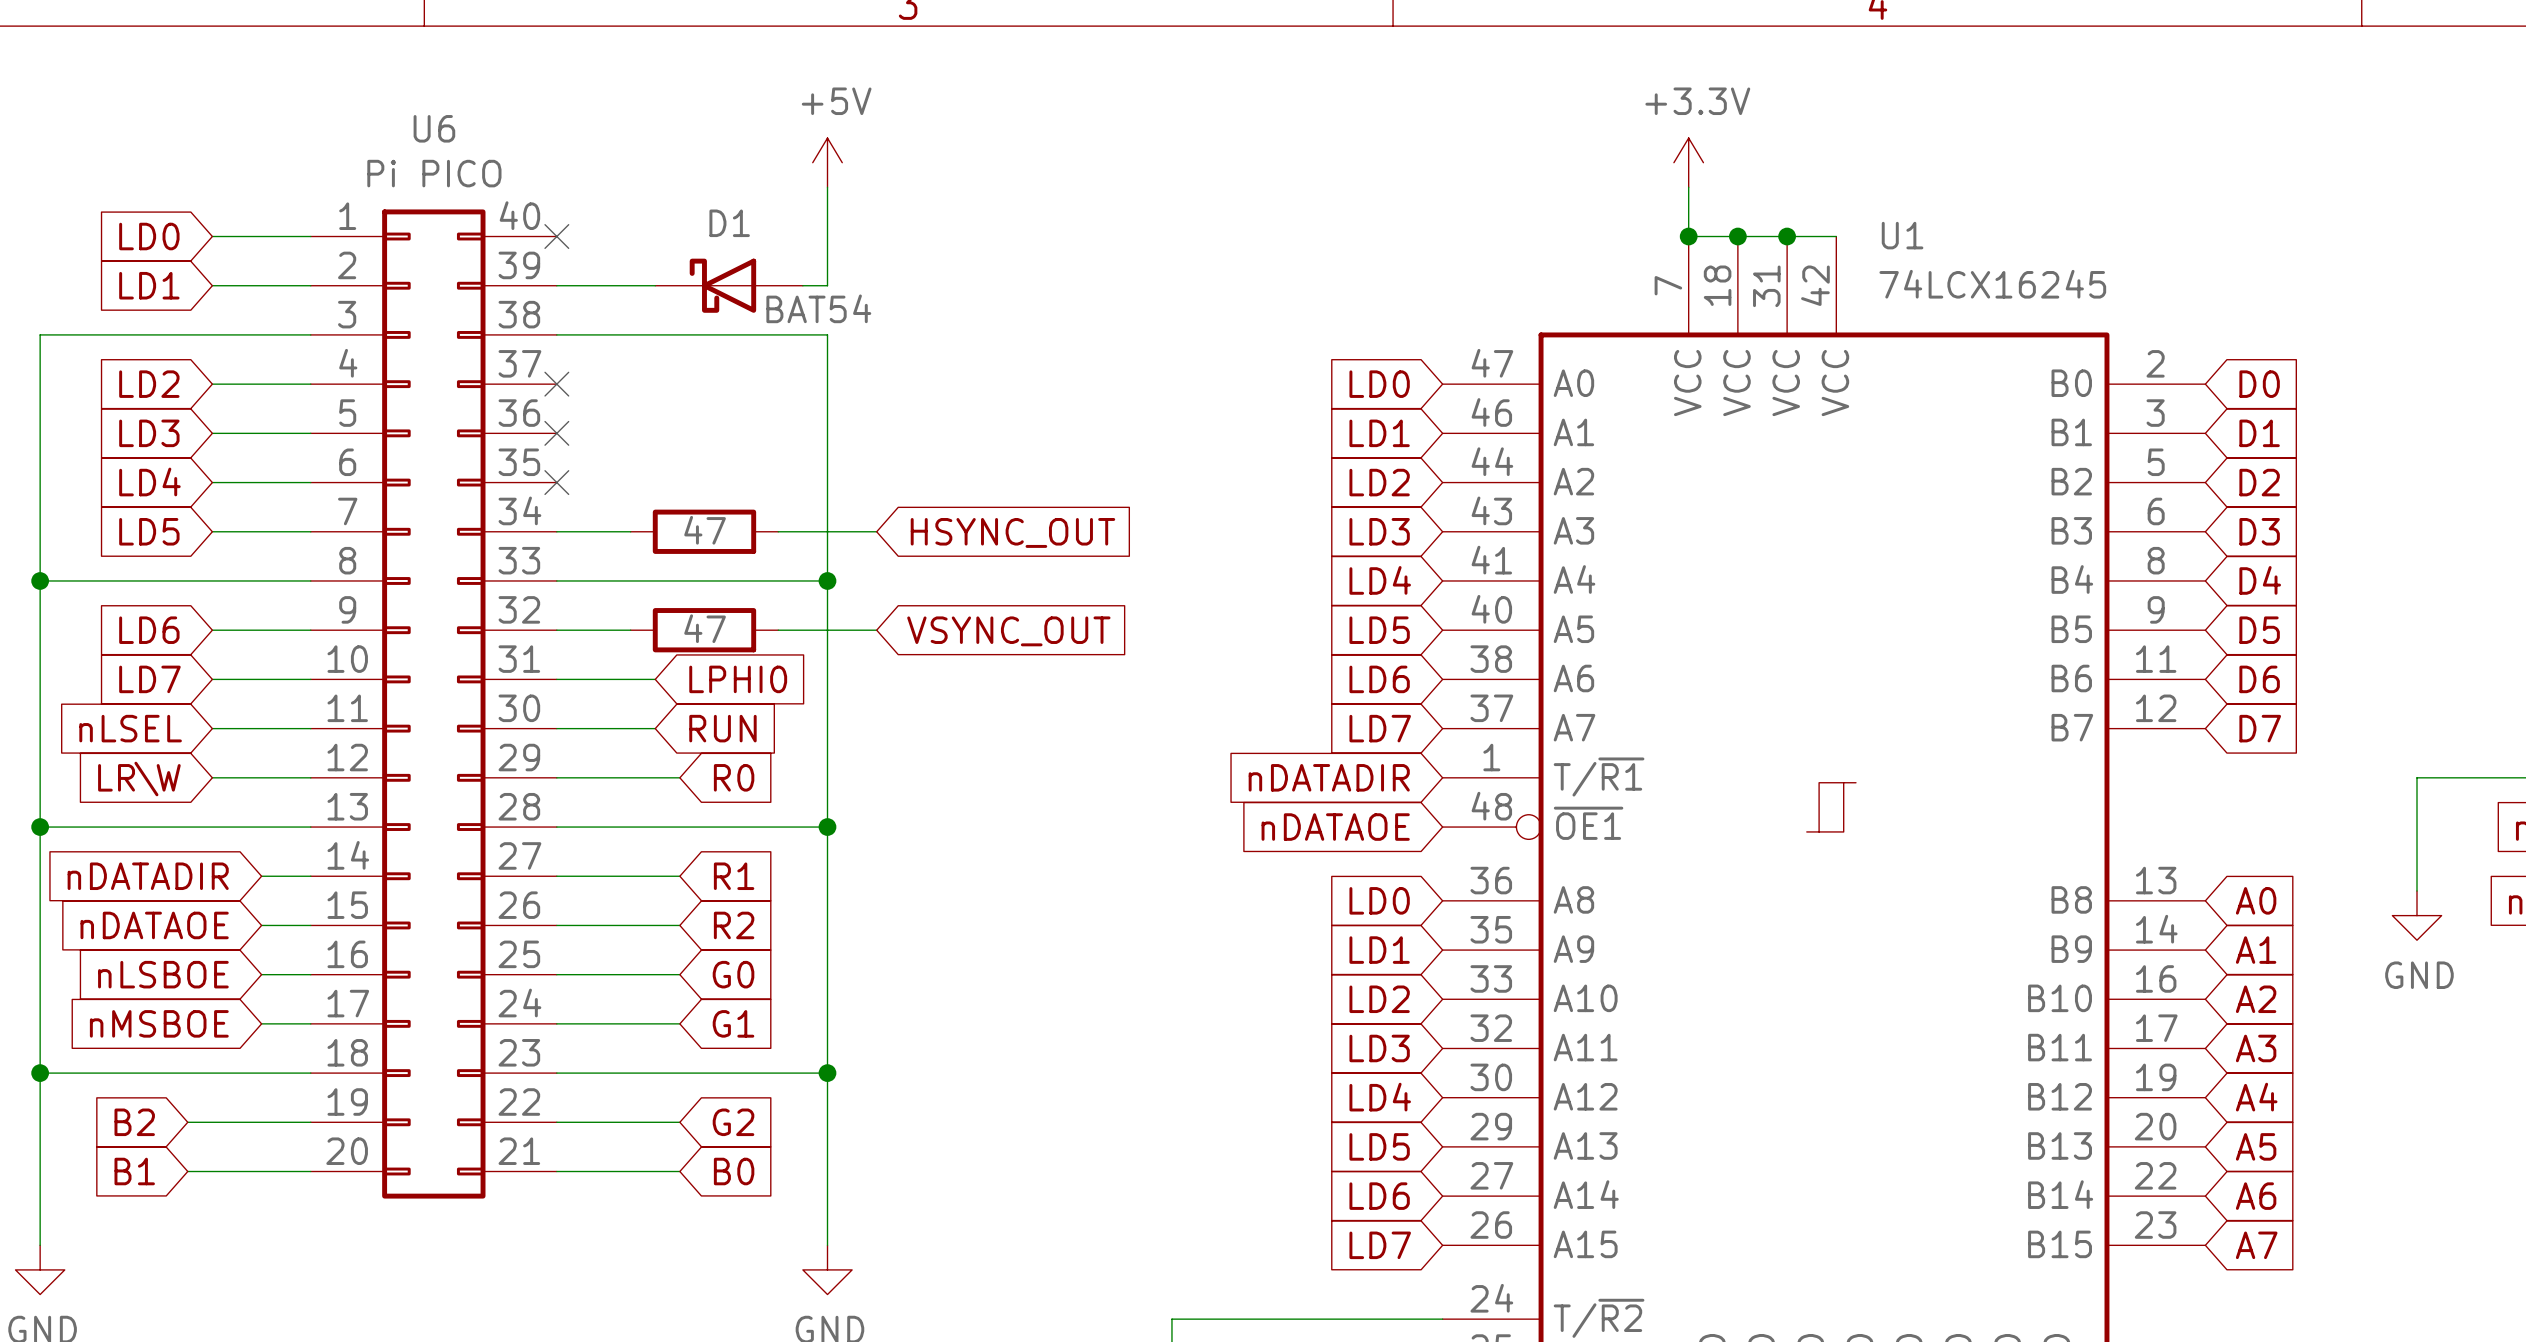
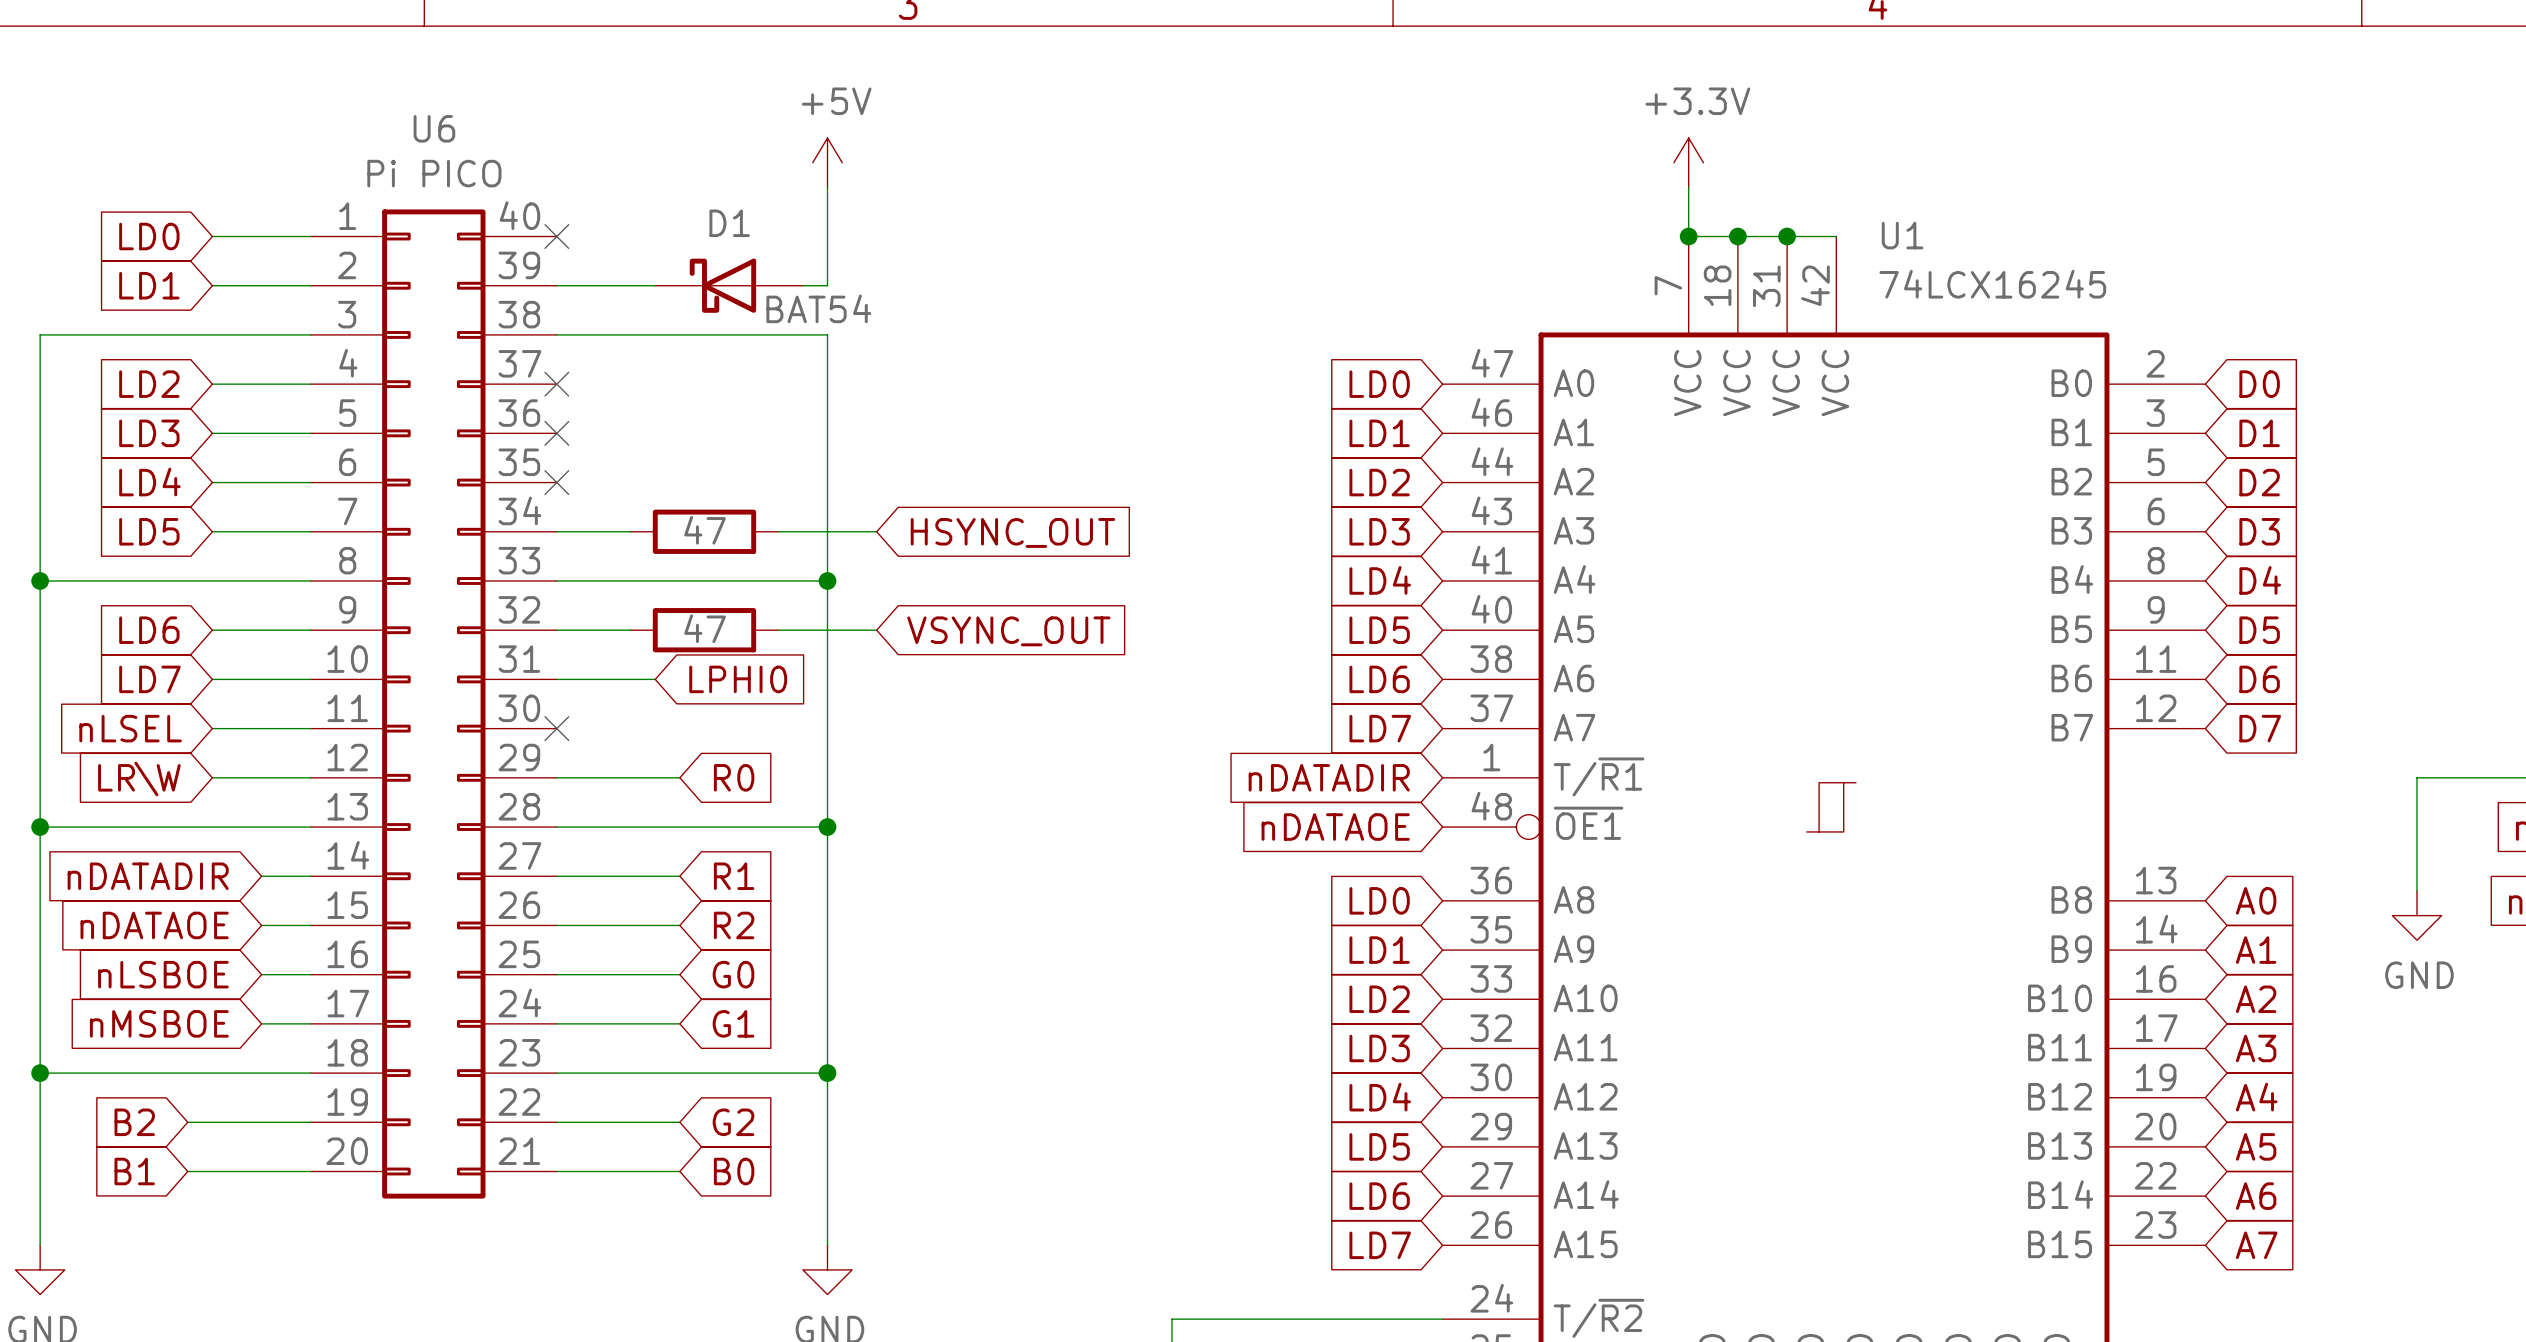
wire: (556, 728) (655, 728) -> none
no-connect mark: none -> (556, 728)
global label: RUN (722, 728) -> none

